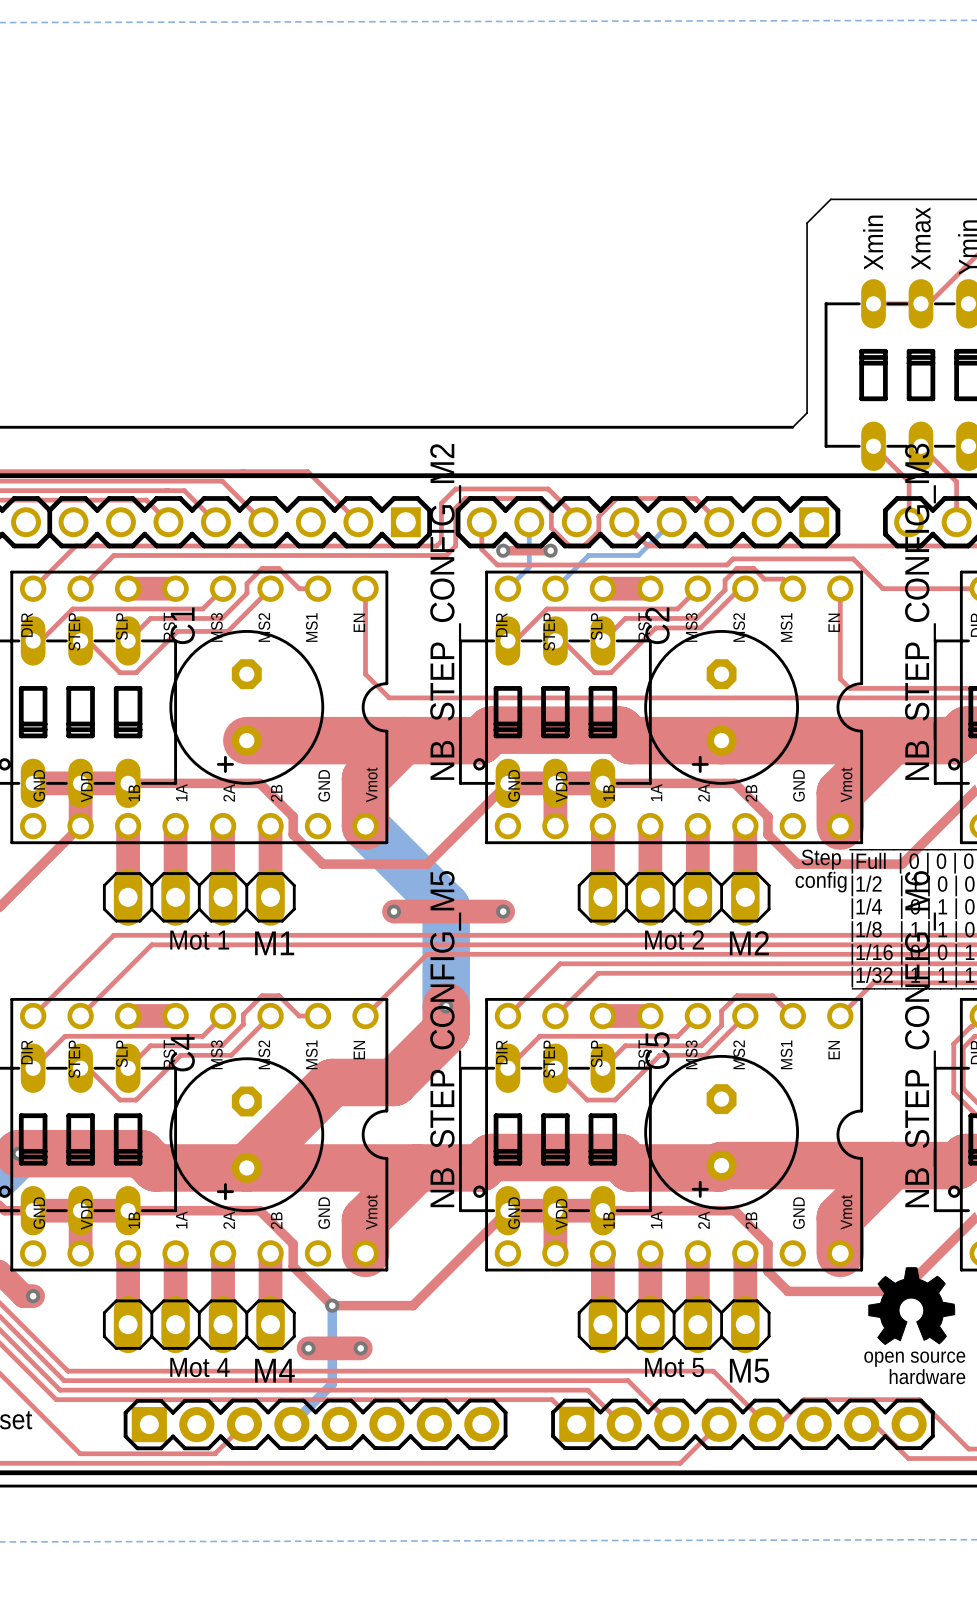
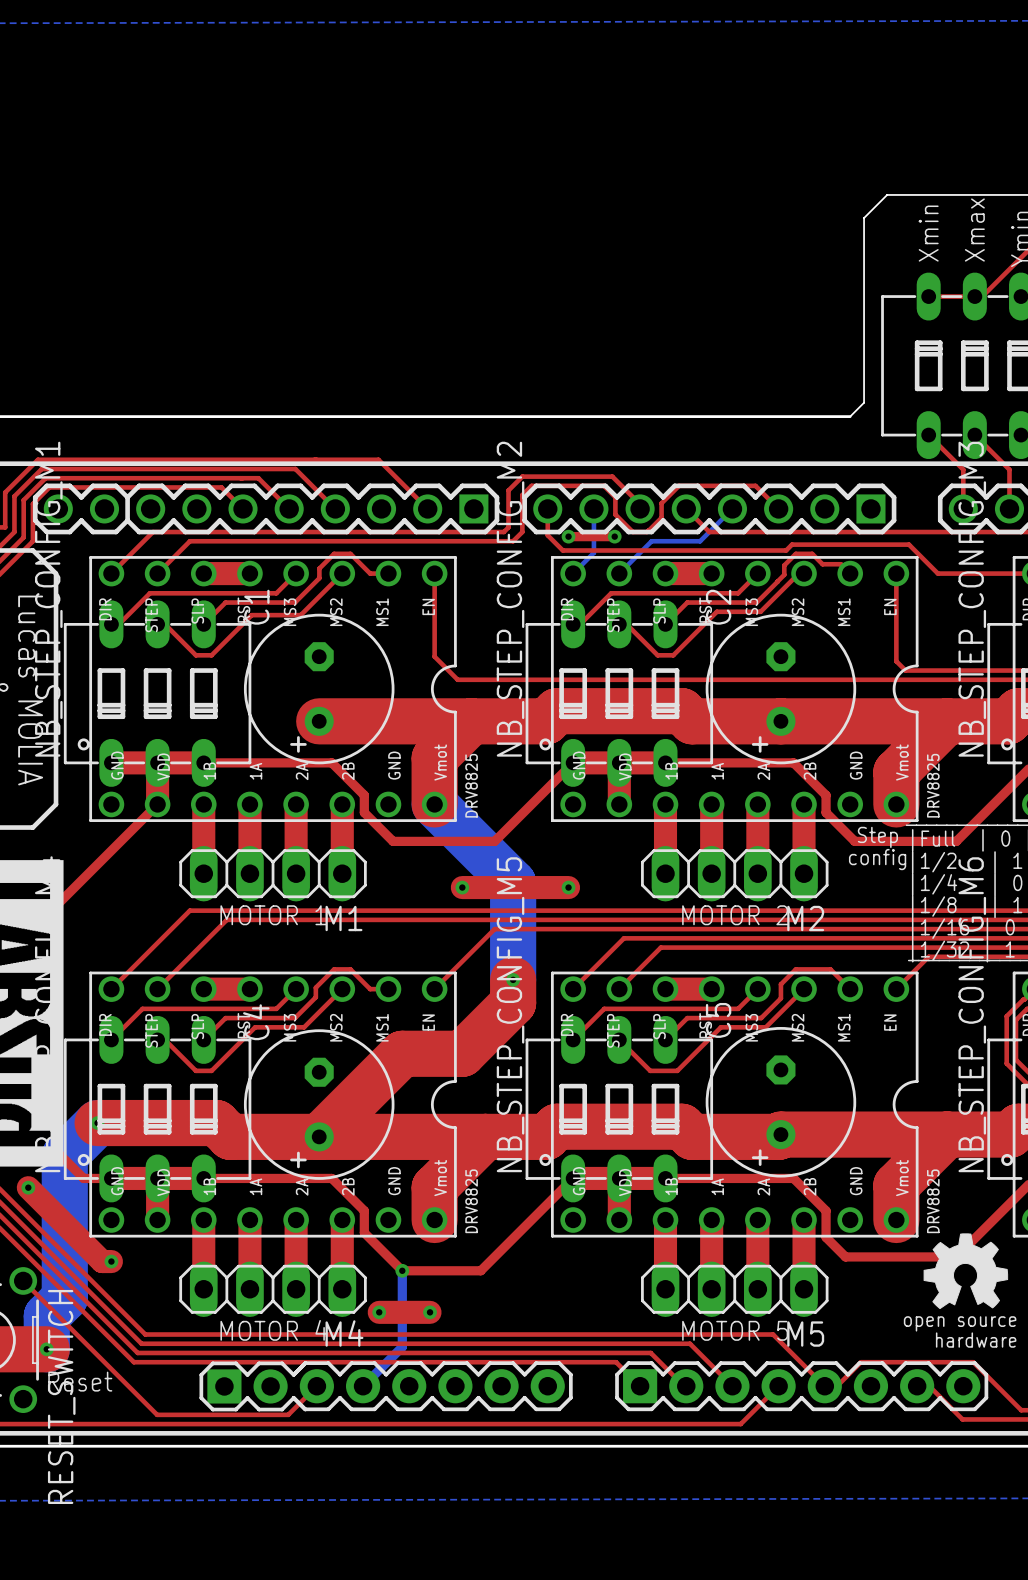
text: none -> DRV8825 (471, 785)
text: none -> DRV8825 (933, 785)
text: Mot 1 (199, 940) -> MOTOR 1 (273, 915)
text: Mot 2 (674, 940) -> MOTOR 2 (735, 915)
text: none -> DRV8825 (471, 1201)
text: none -> DRV8825 (933, 1201)
text: Mot 4 (199, 1367) -> MOTOR 4 (273, 1330)
text: Mot 5 (674, 1367) -> MOTOR 5 (735, 1330)

